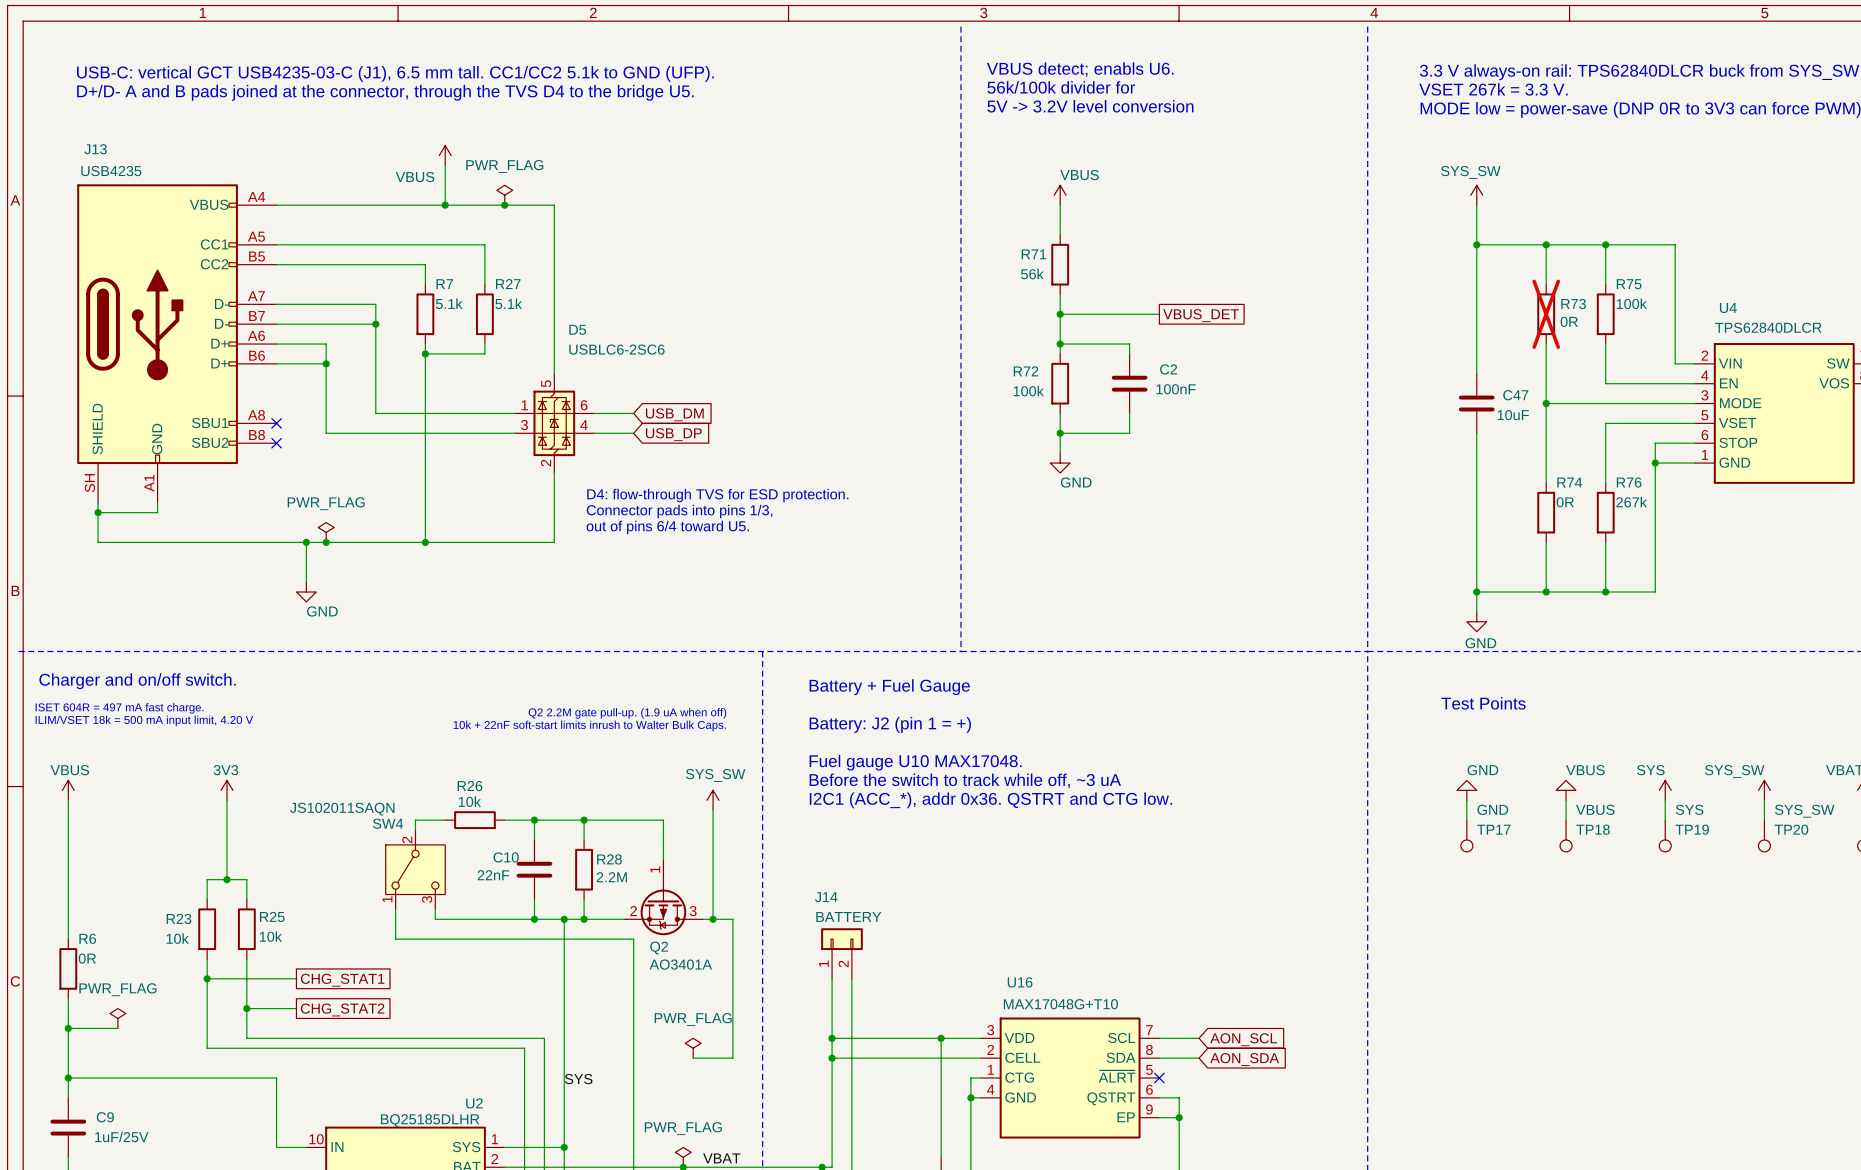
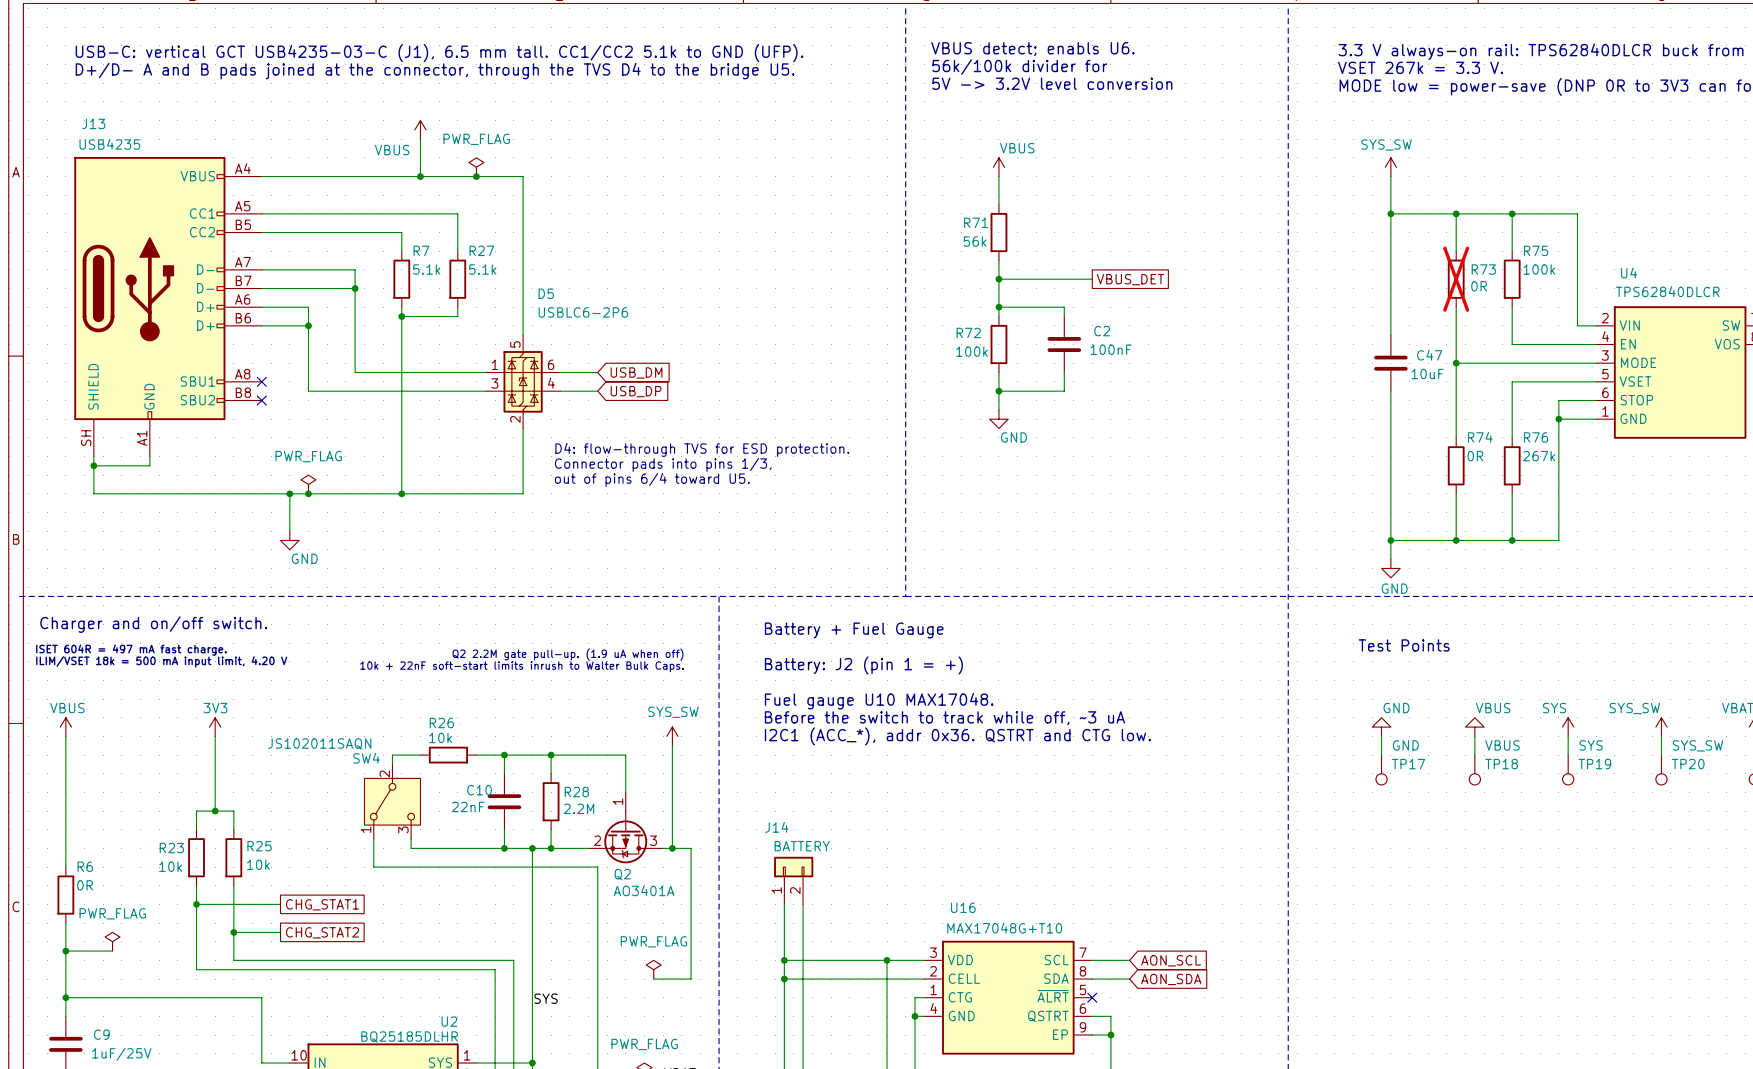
D5 value: USBLC6-2SC6 (616, 349) -> USBLC6-2P6 (583, 312)

